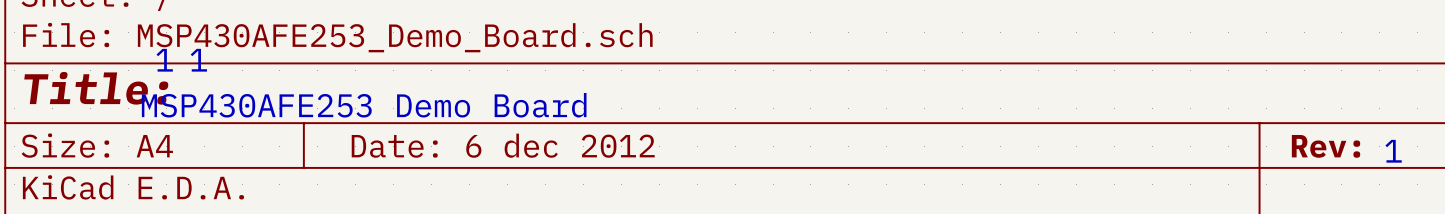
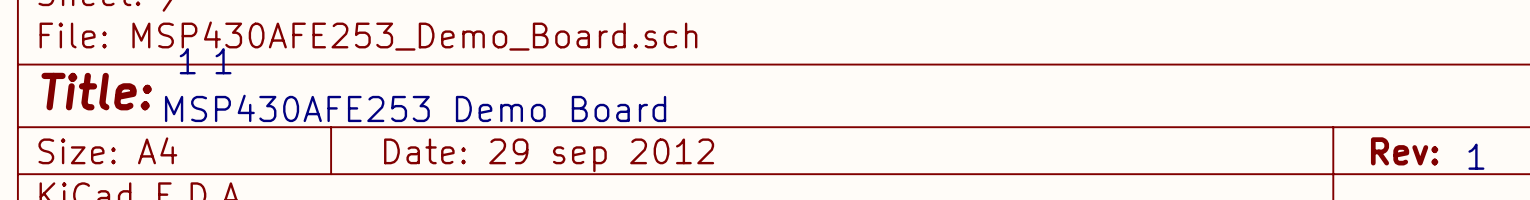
title block: Date: 6 dec 2012 (503, 145) -> Date: 29 sep 2012 (549, 155)

